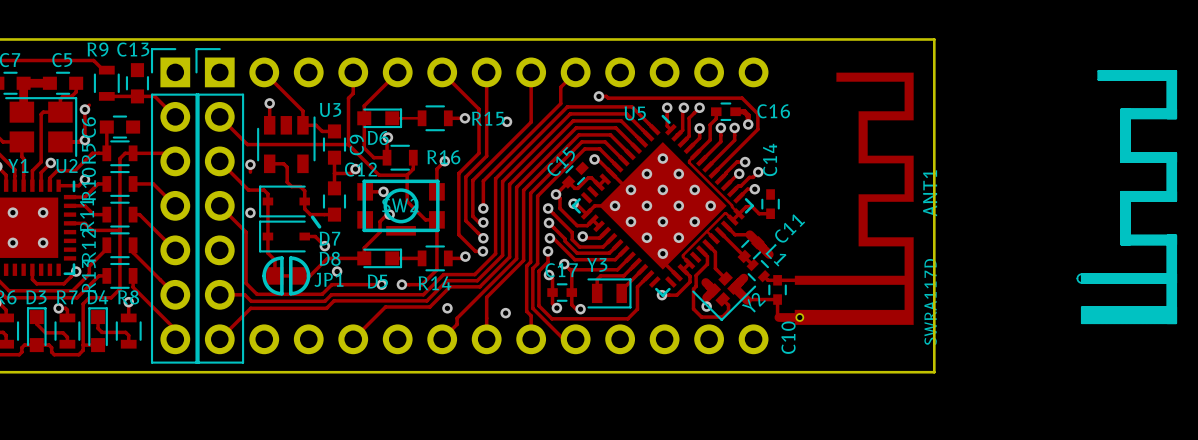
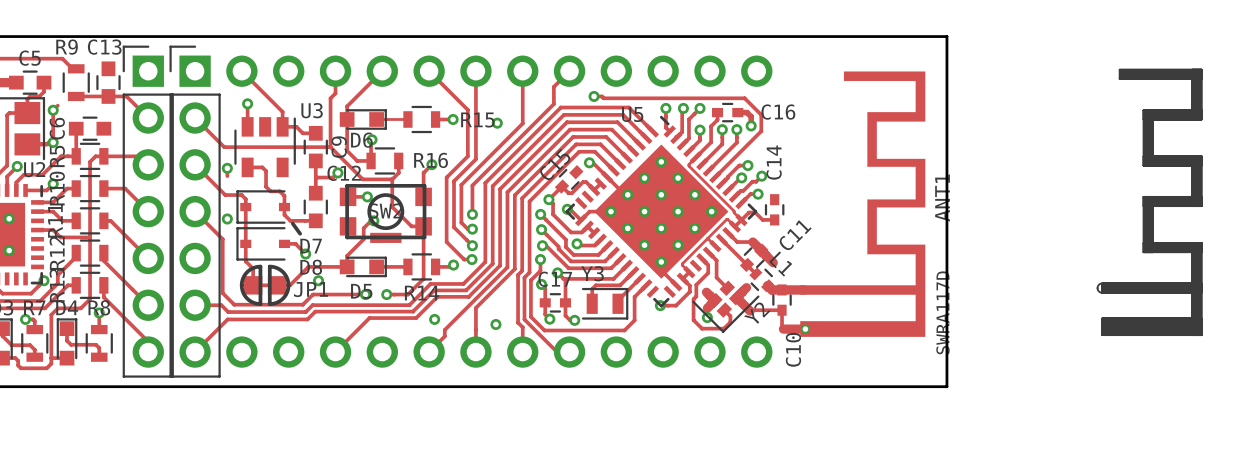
track width: thin (763, 276) (767, 280) (798, 280) -> thick (767, 285) (771, 289) (804, 289)

